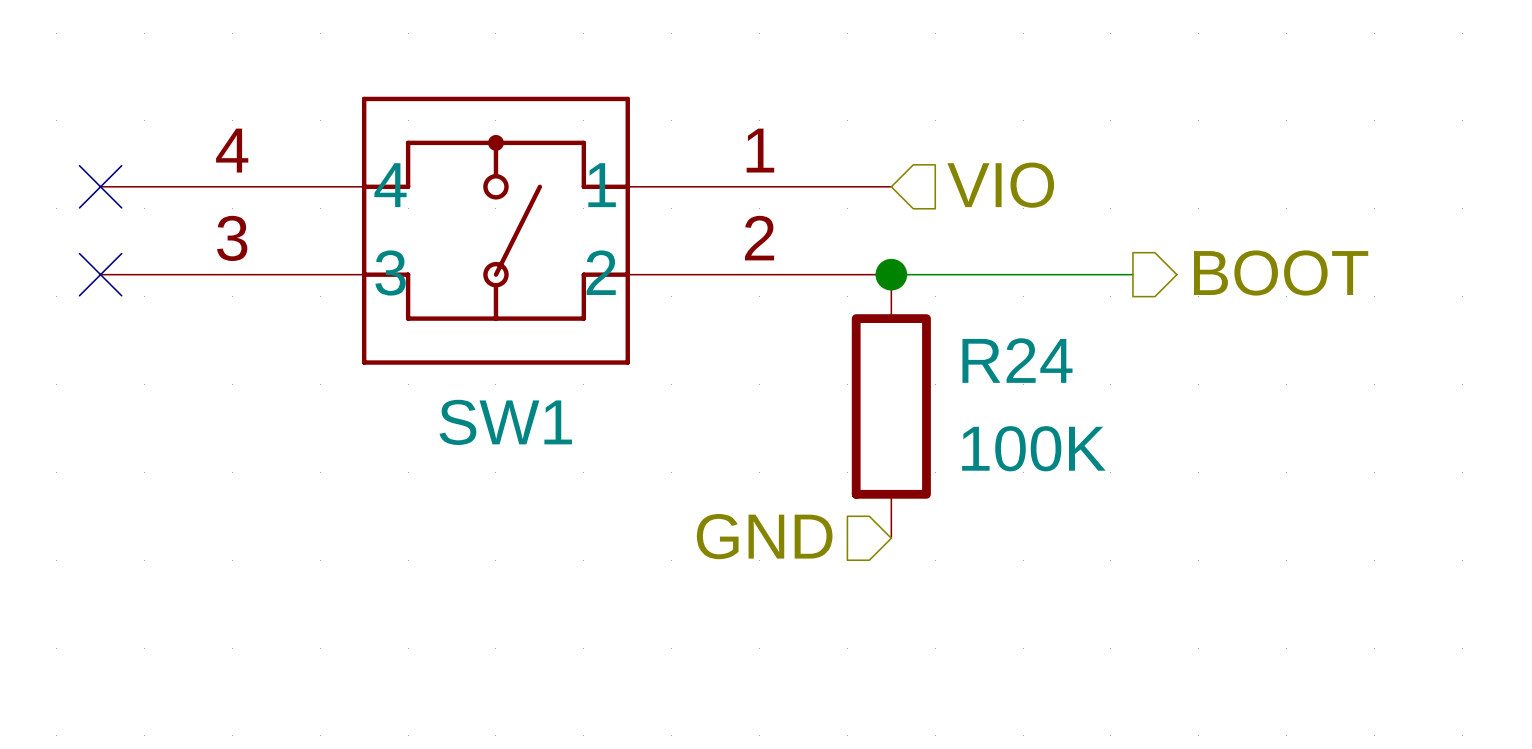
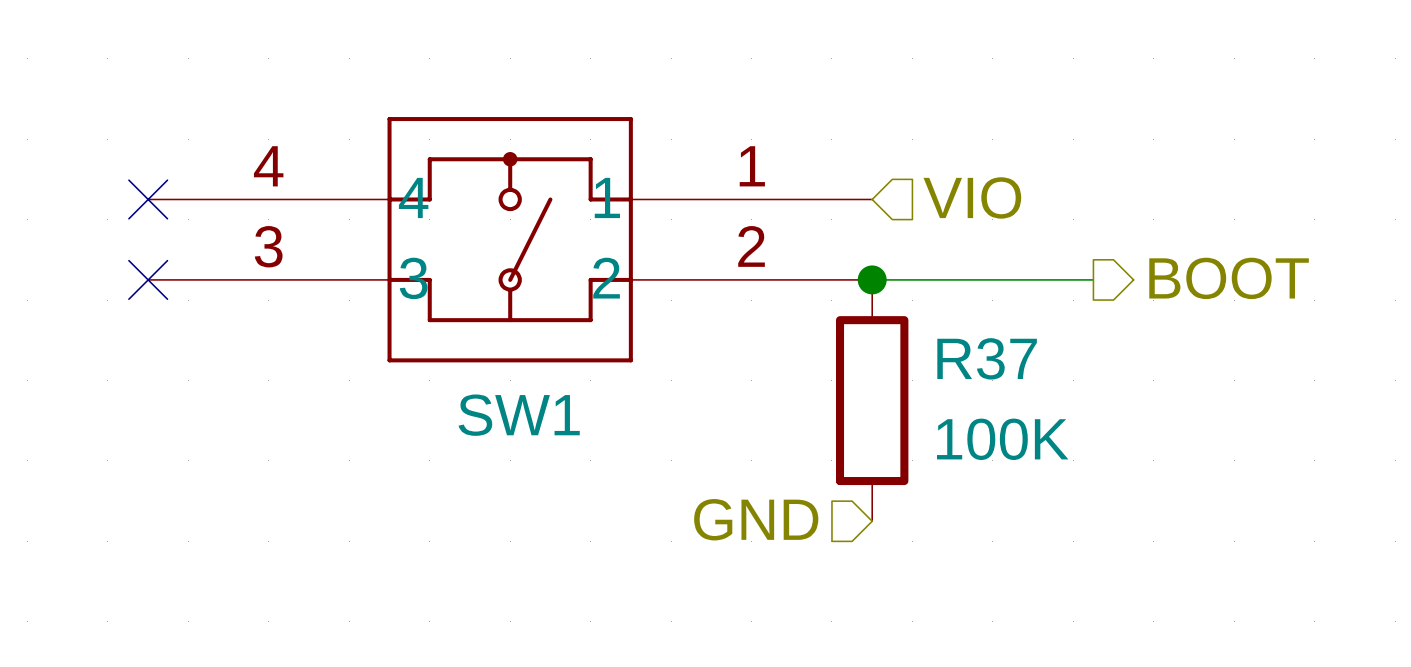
R24 name: R24 (1017, 360) -> R37 (987, 358)

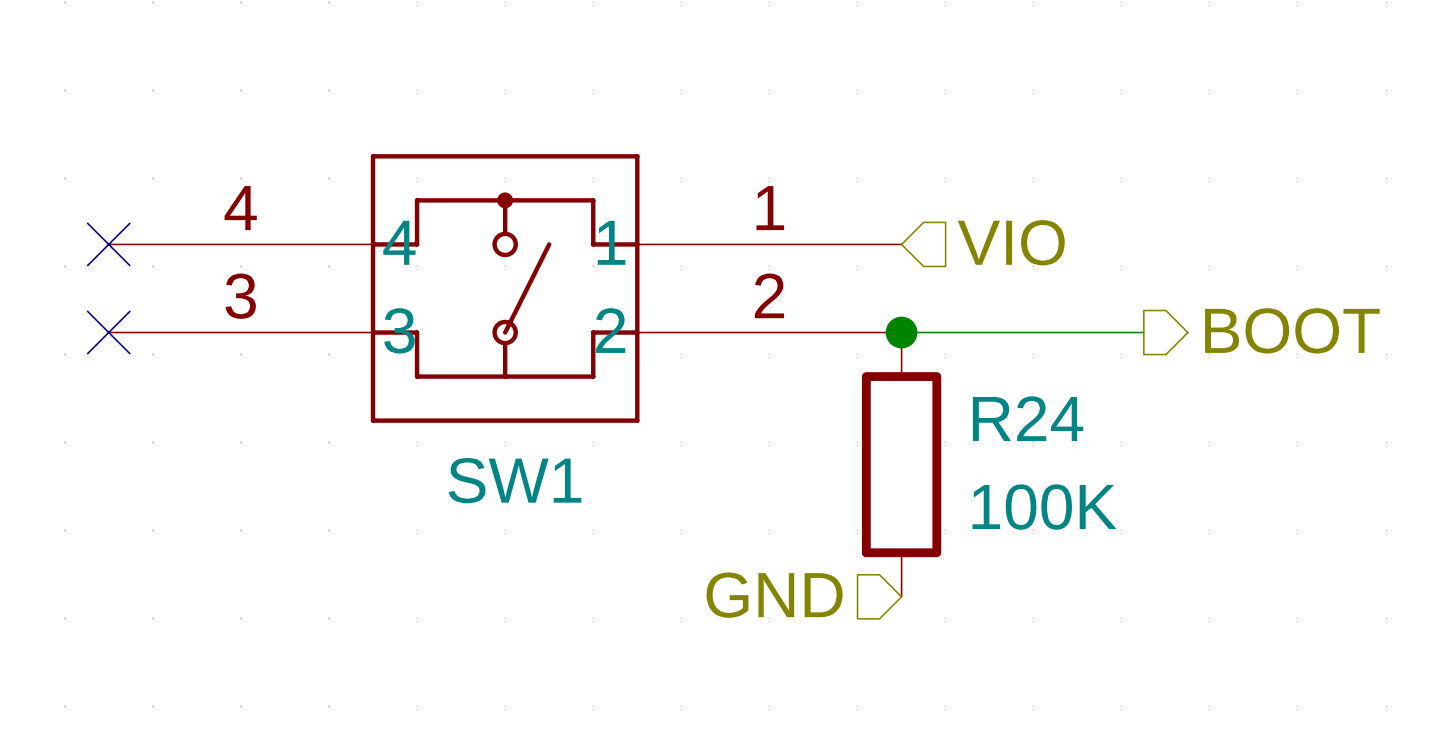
R37 name: R37 (987, 358) -> R24 (1028, 418)

